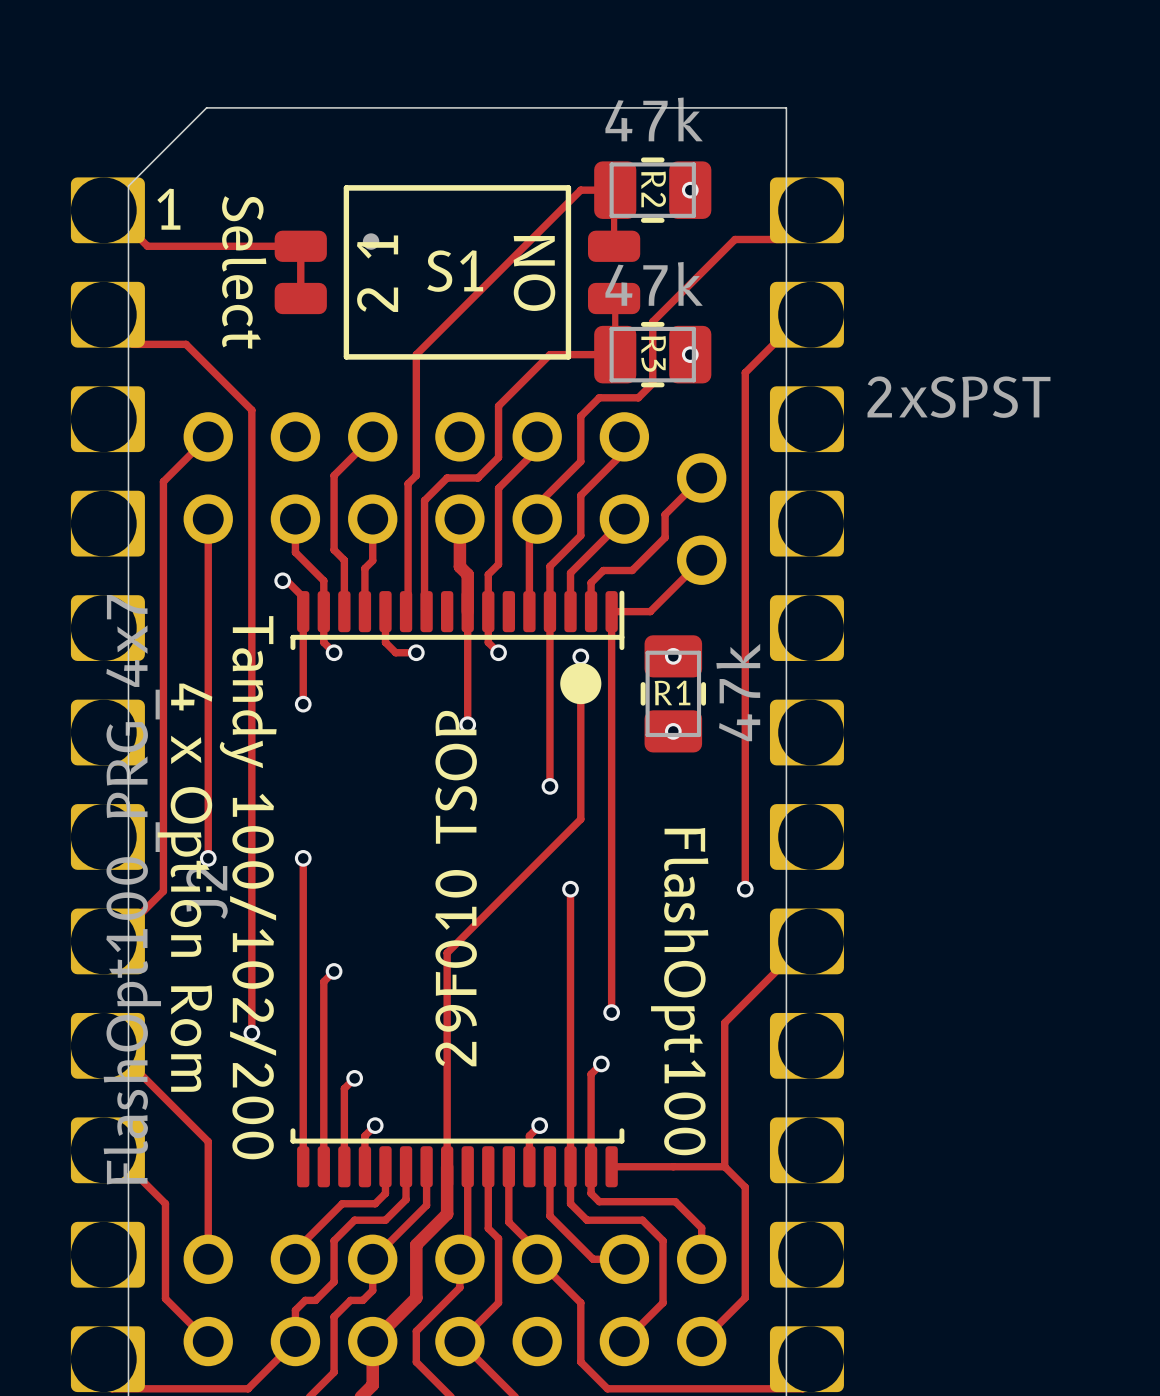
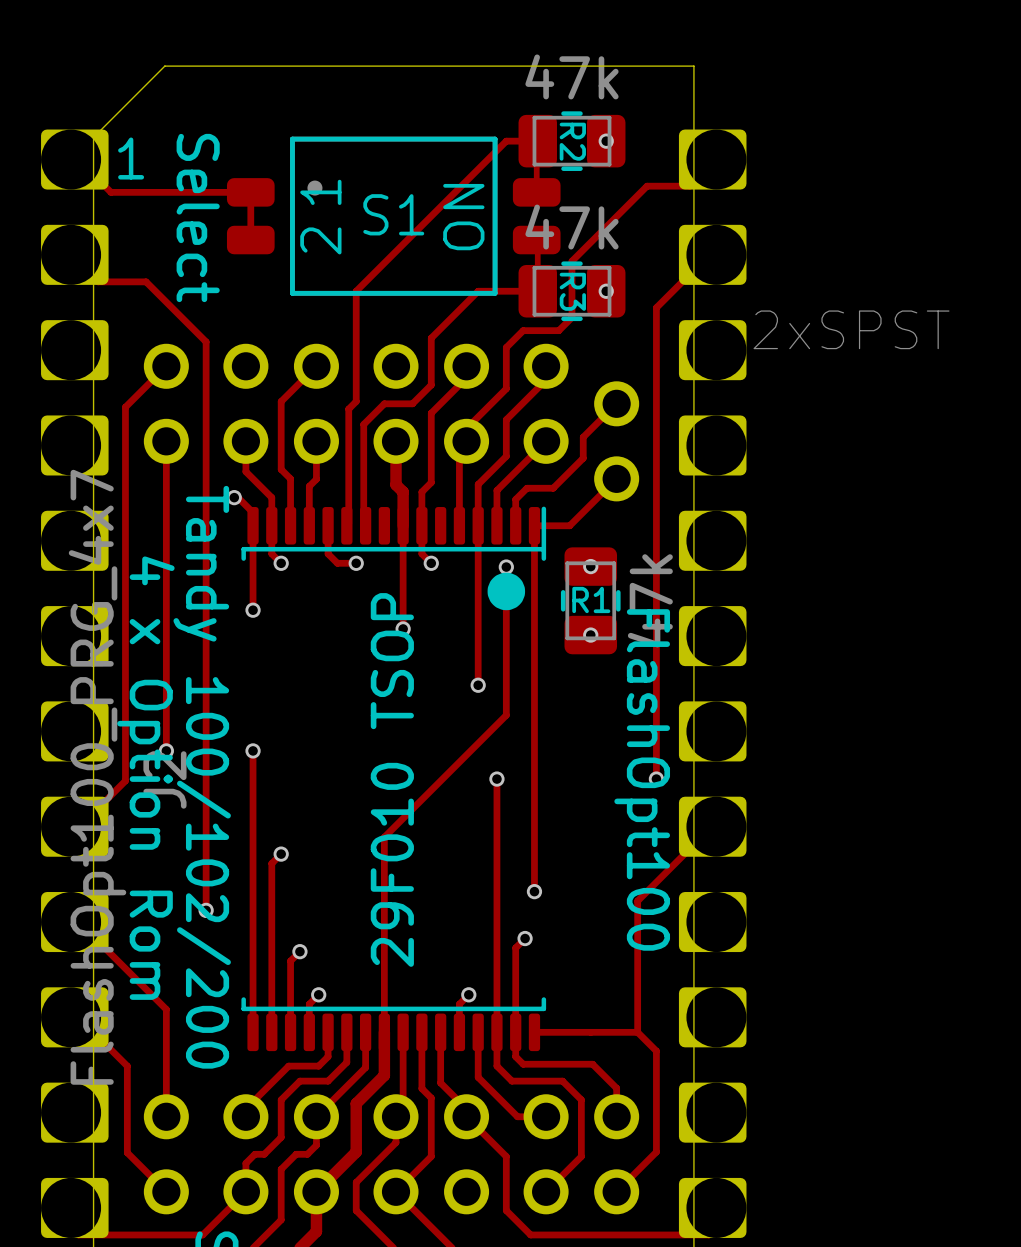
text position: FlashOpt100 (679, 991) -> FlashOpt100 (642, 779)

